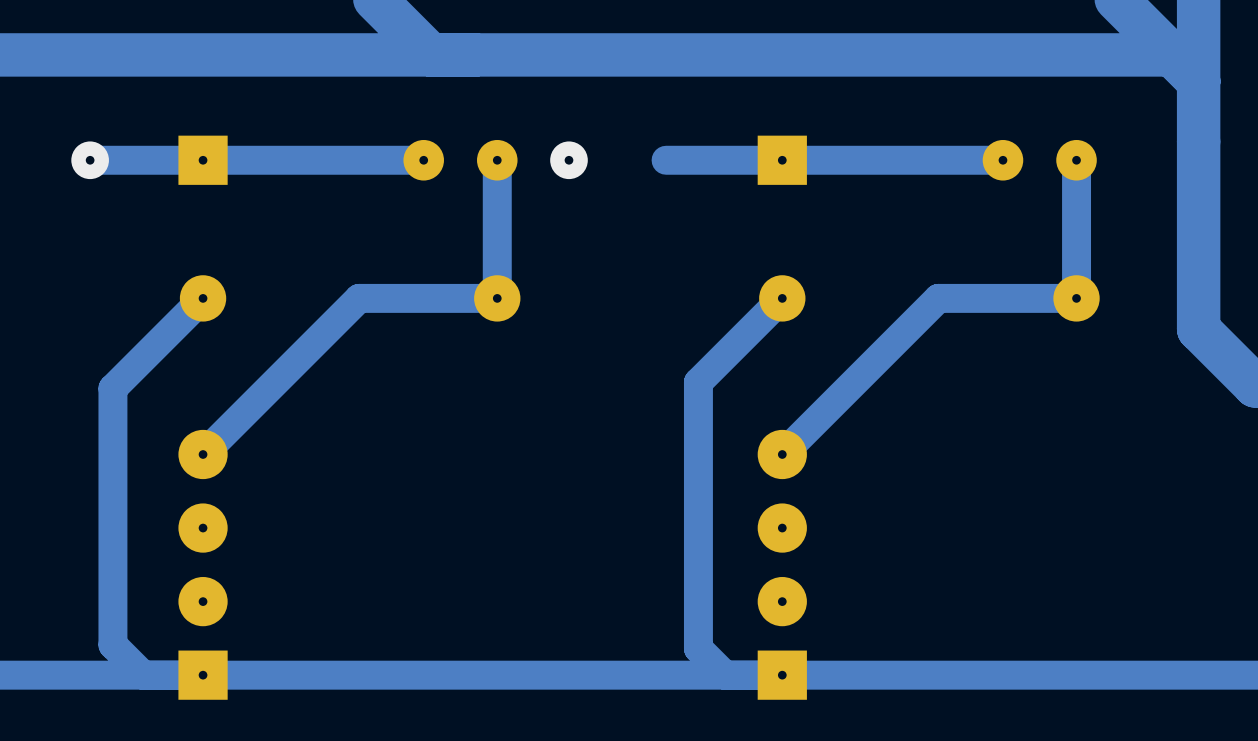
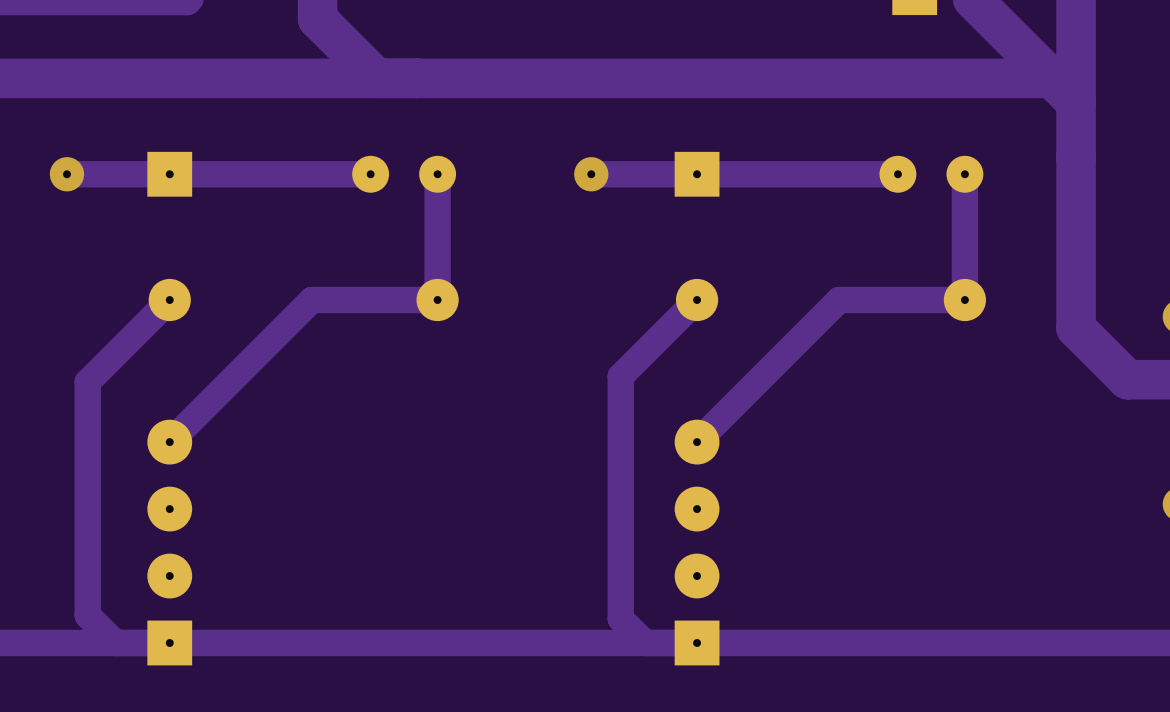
via position: (568, 160) -> (591, 174)

